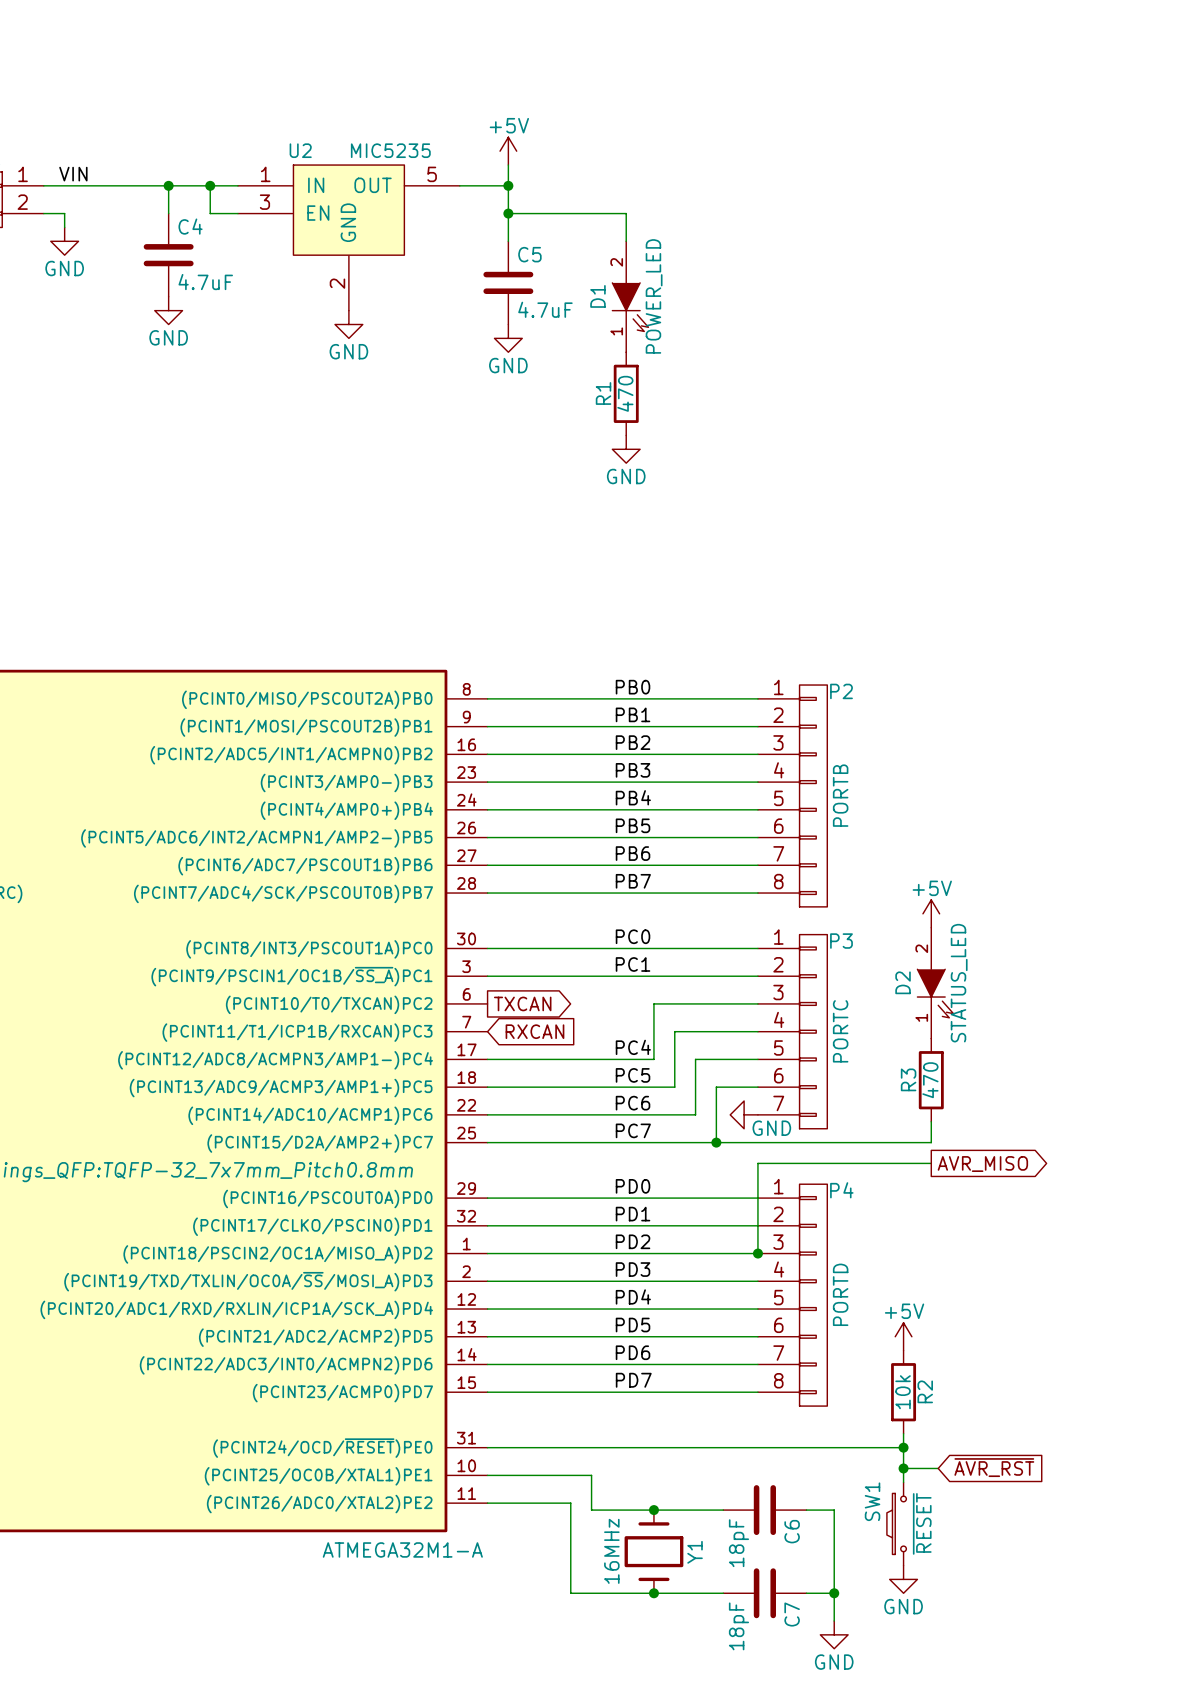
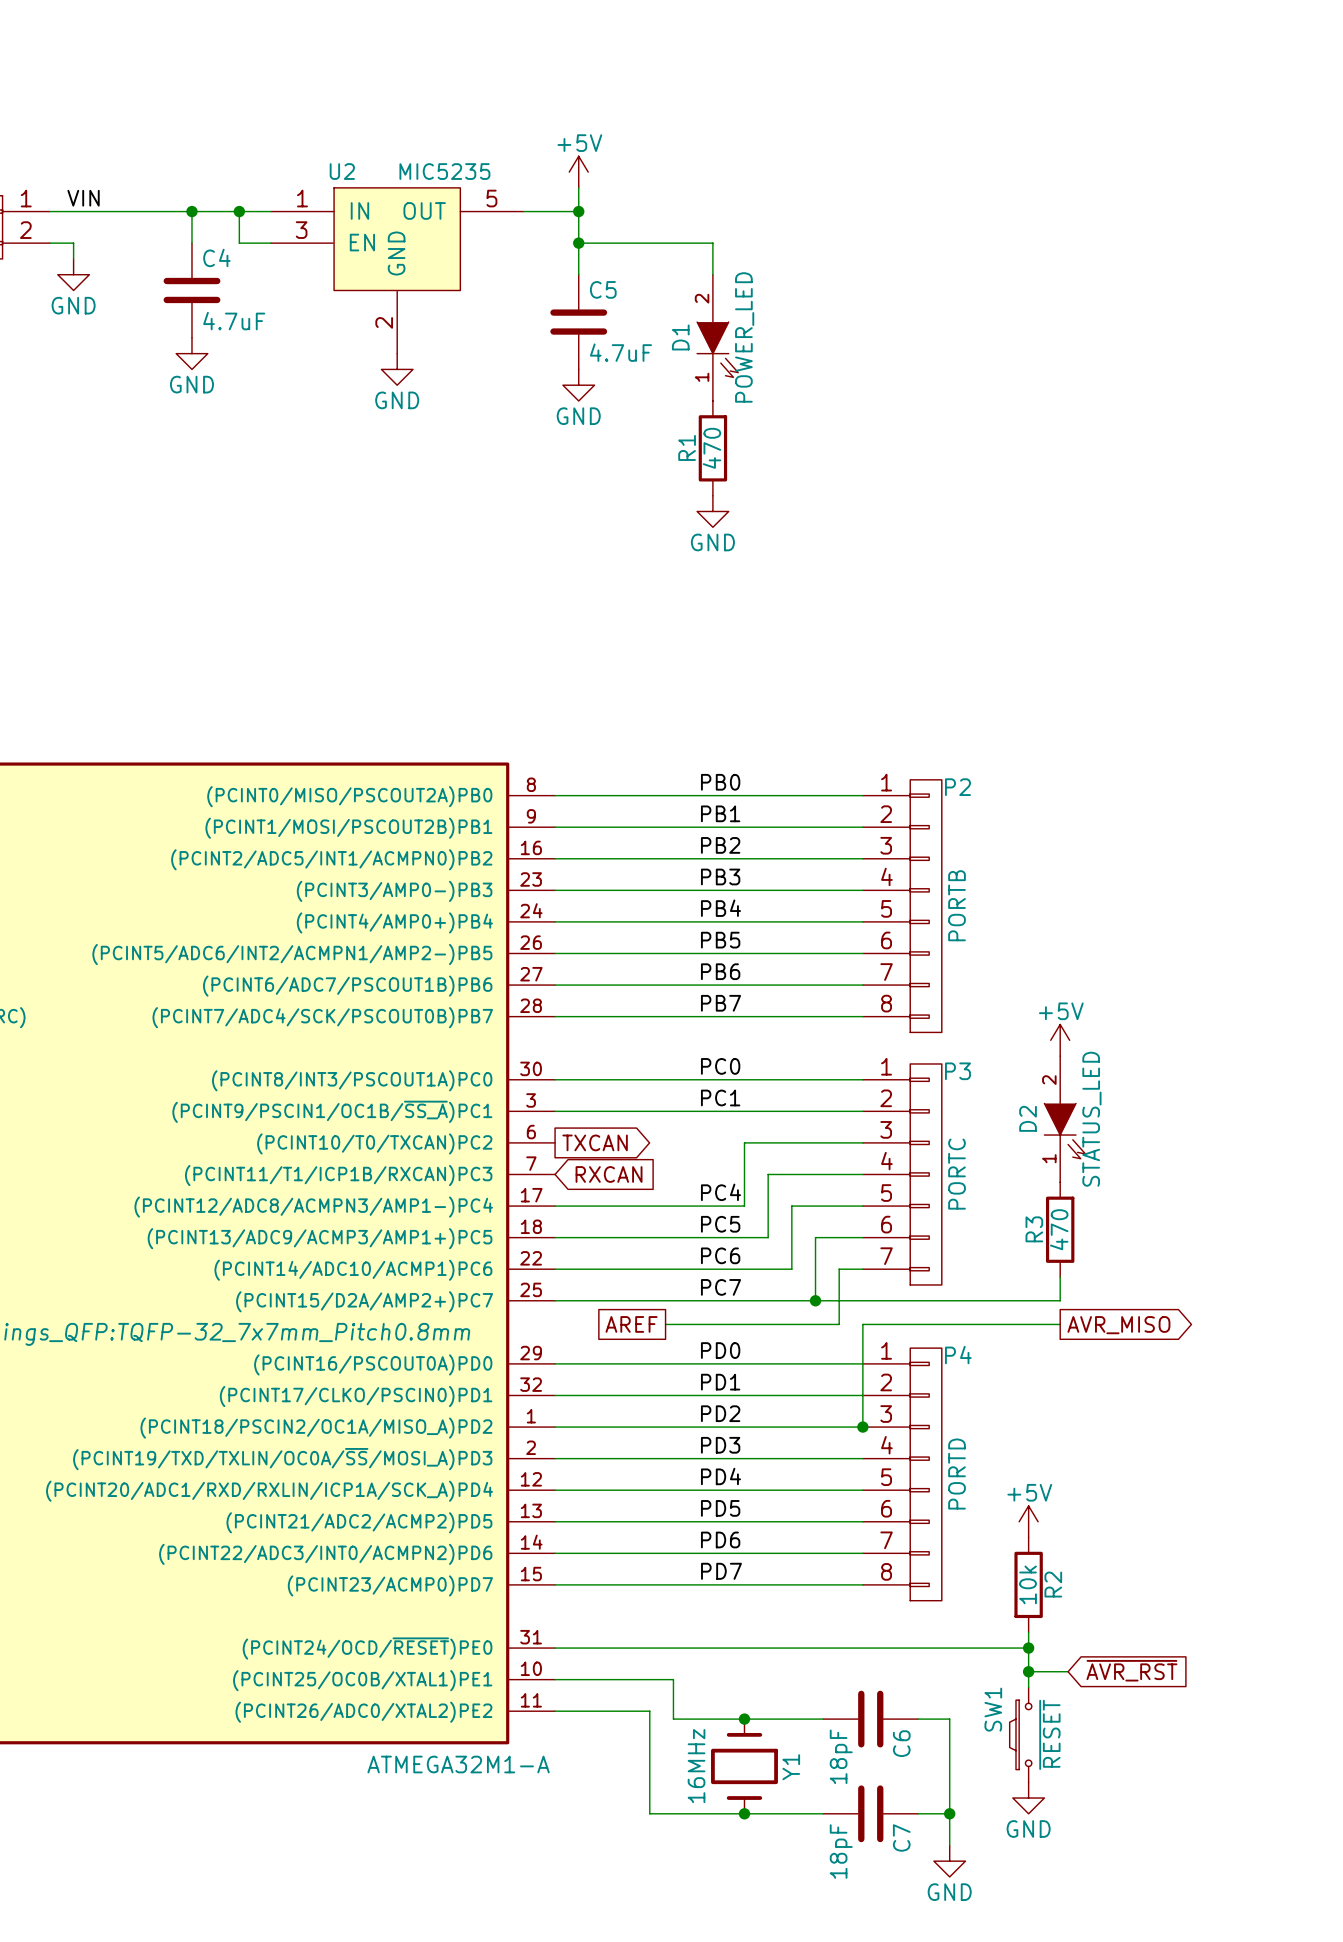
power symbol: GND (744, 1114) -> none
wire: none -> (862, 1269) (839, 1269) (839, 1324) (665, 1324)
global label: none -> AREF (631, 1324)

